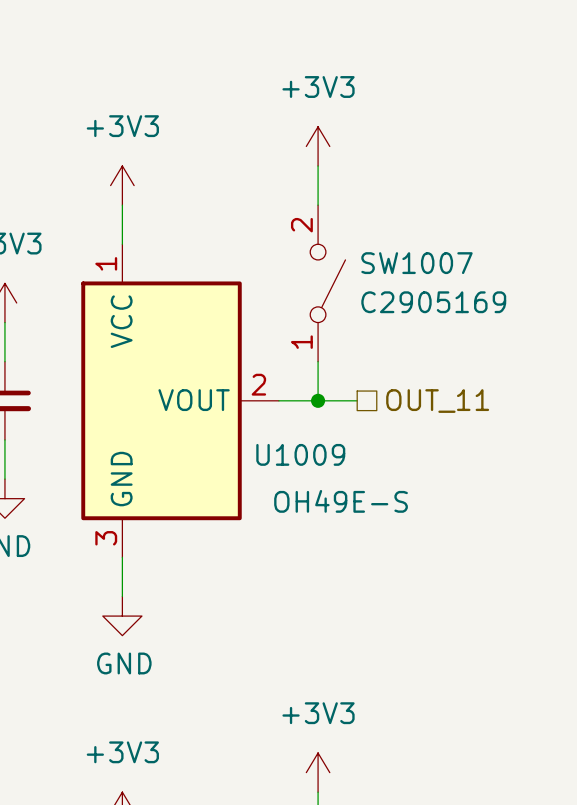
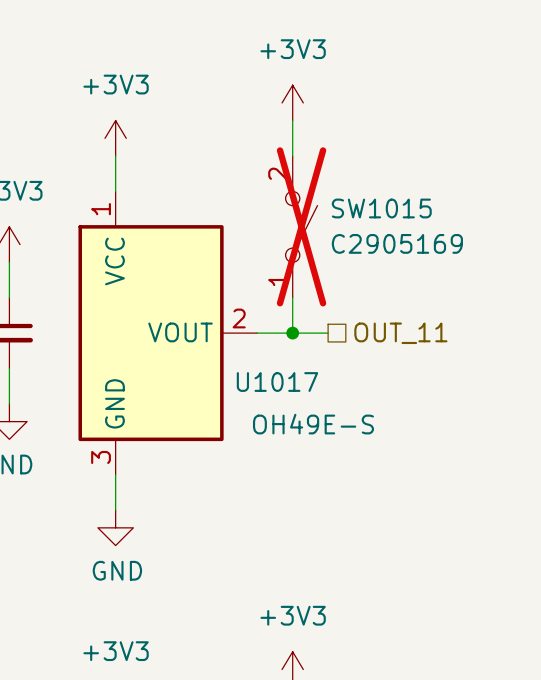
SW1007 name: SW1007 (416, 263) -> SW1015 (381, 208)
SW1007 do-not-place cross: none -> (301, 226)
U1009 name: U1009 (300, 454) -> U1017 (277, 382)

